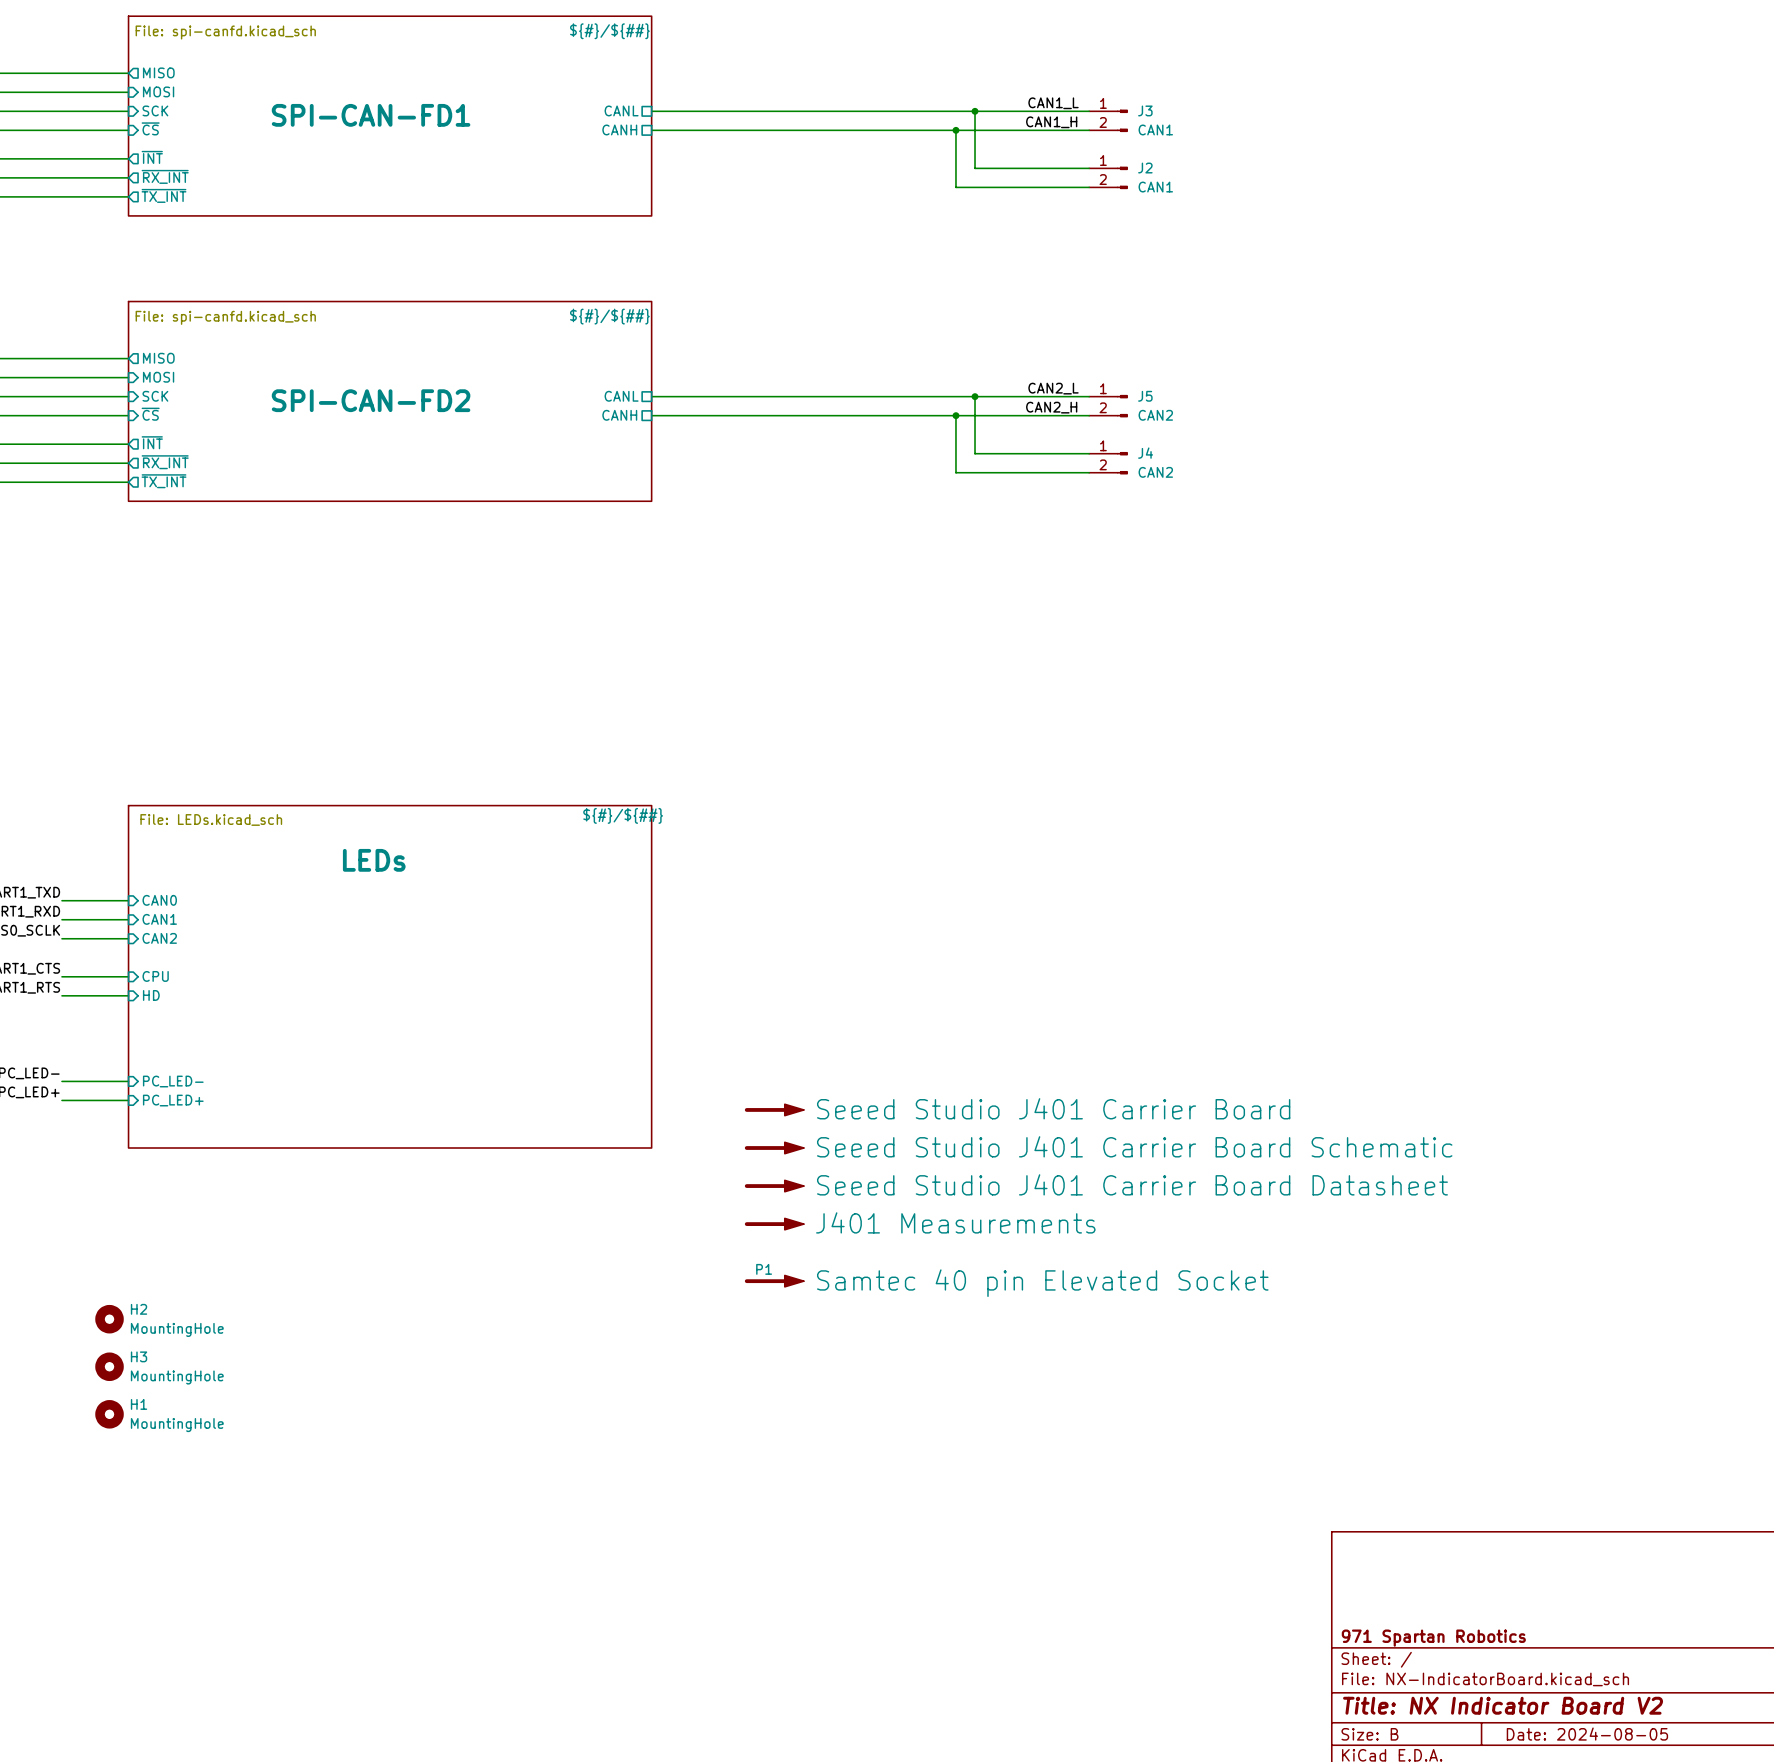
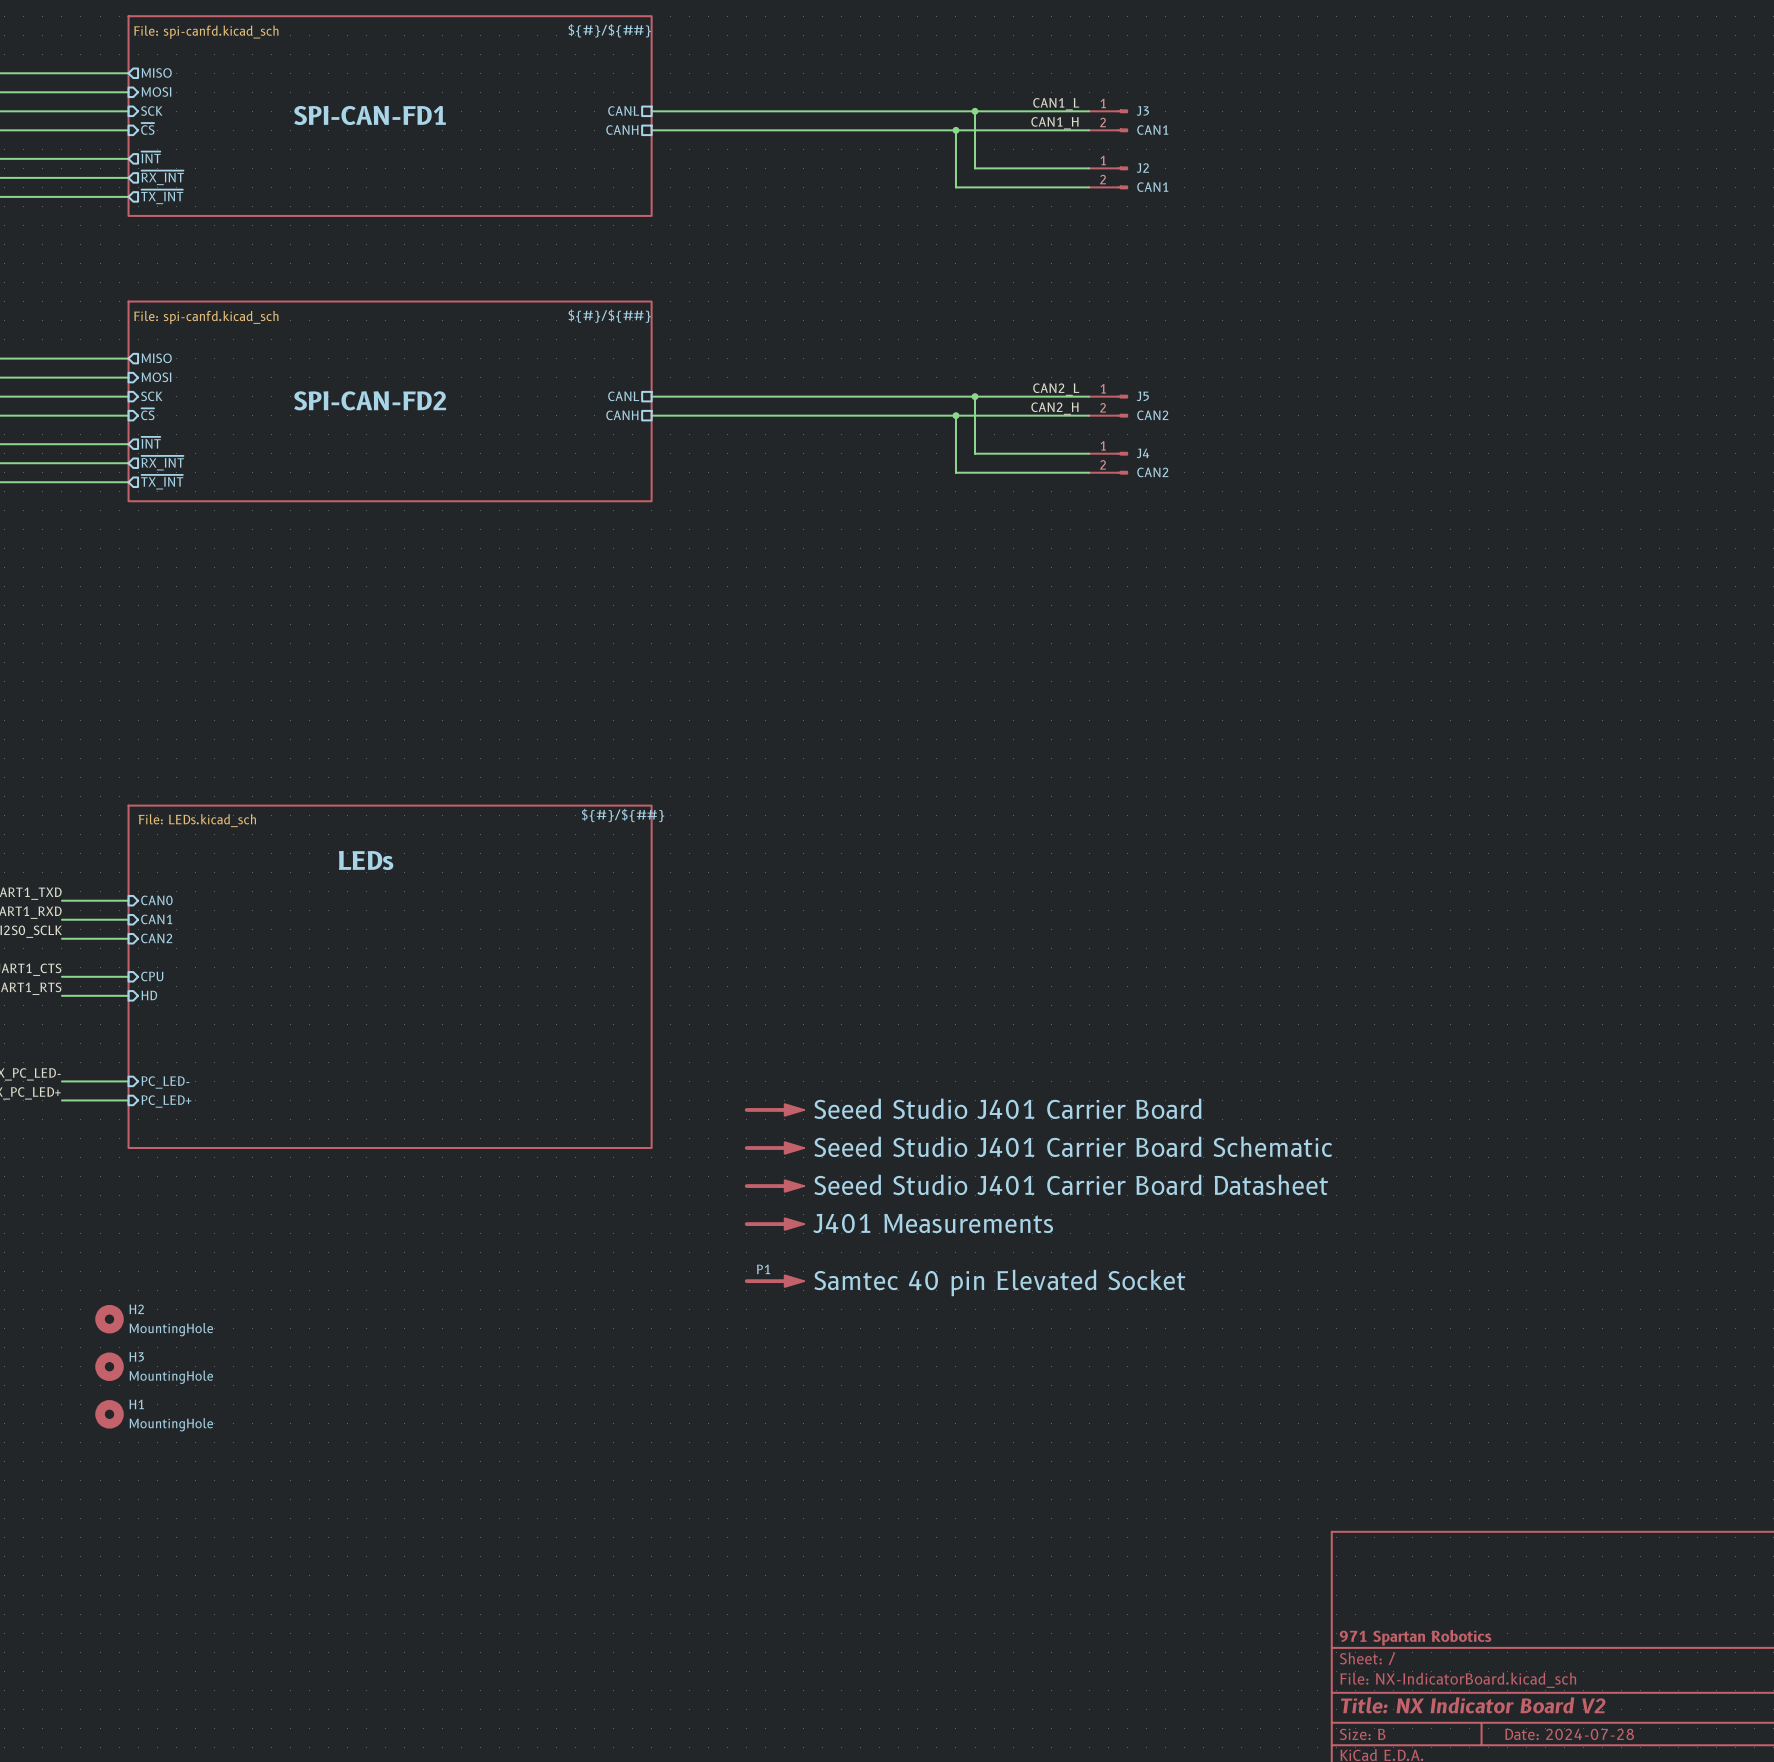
title block: Date: 2024-08-05 (1587, 1734) -> Date: 2024-07-28 (1569, 1734)

